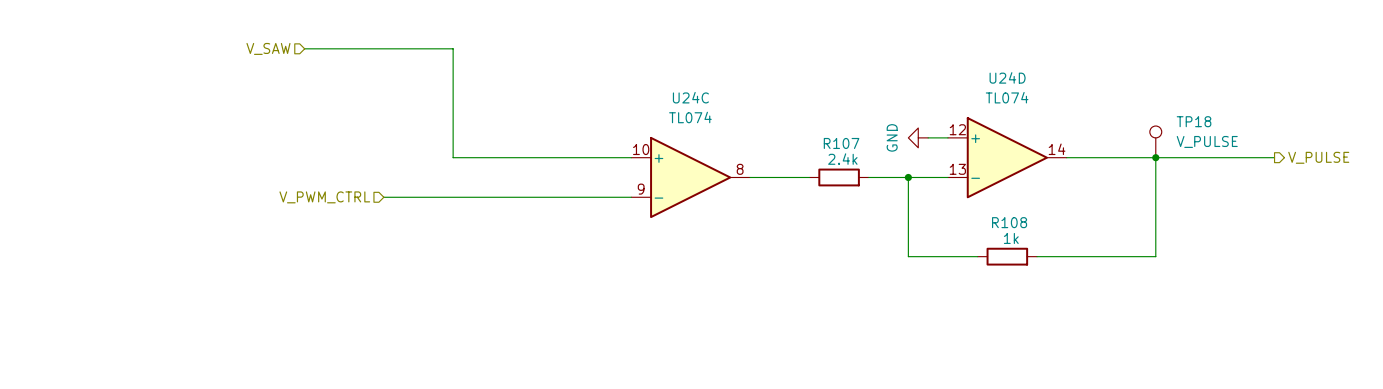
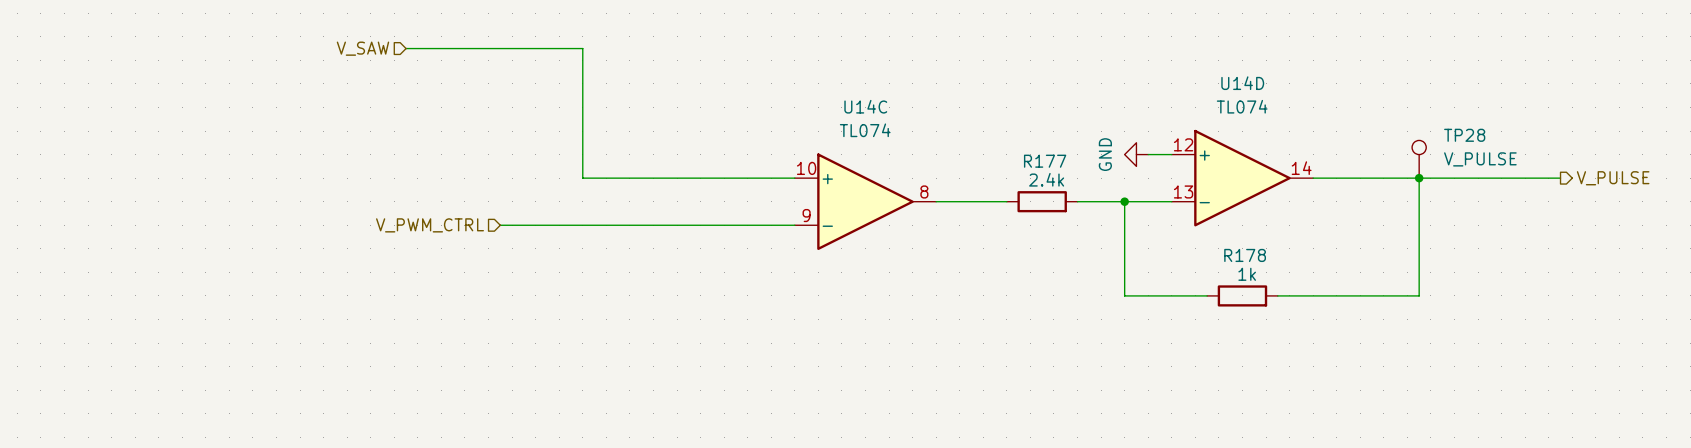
U24D name: U24D (1007, 77) -> U14D (1242, 83)
U24C name: U24C (690, 97) -> U14C (865, 106)
TP18 name: TP18 (1194, 121) -> TP28 (1464, 135)
R107 name: R107 (841, 143) -> R177 (1045, 161)
R108 name: R108 (1009, 222) -> R178 (1245, 255)

